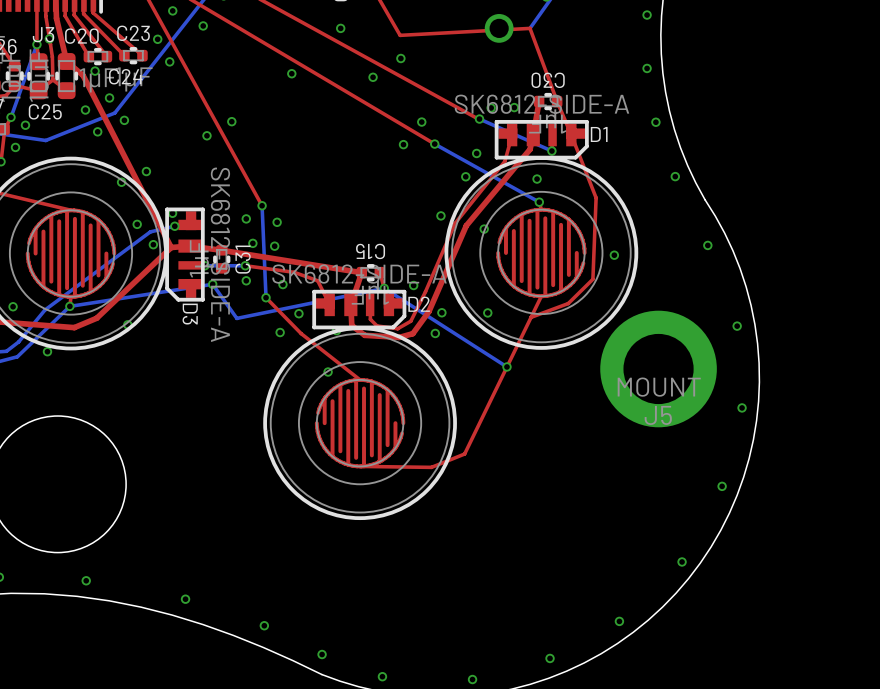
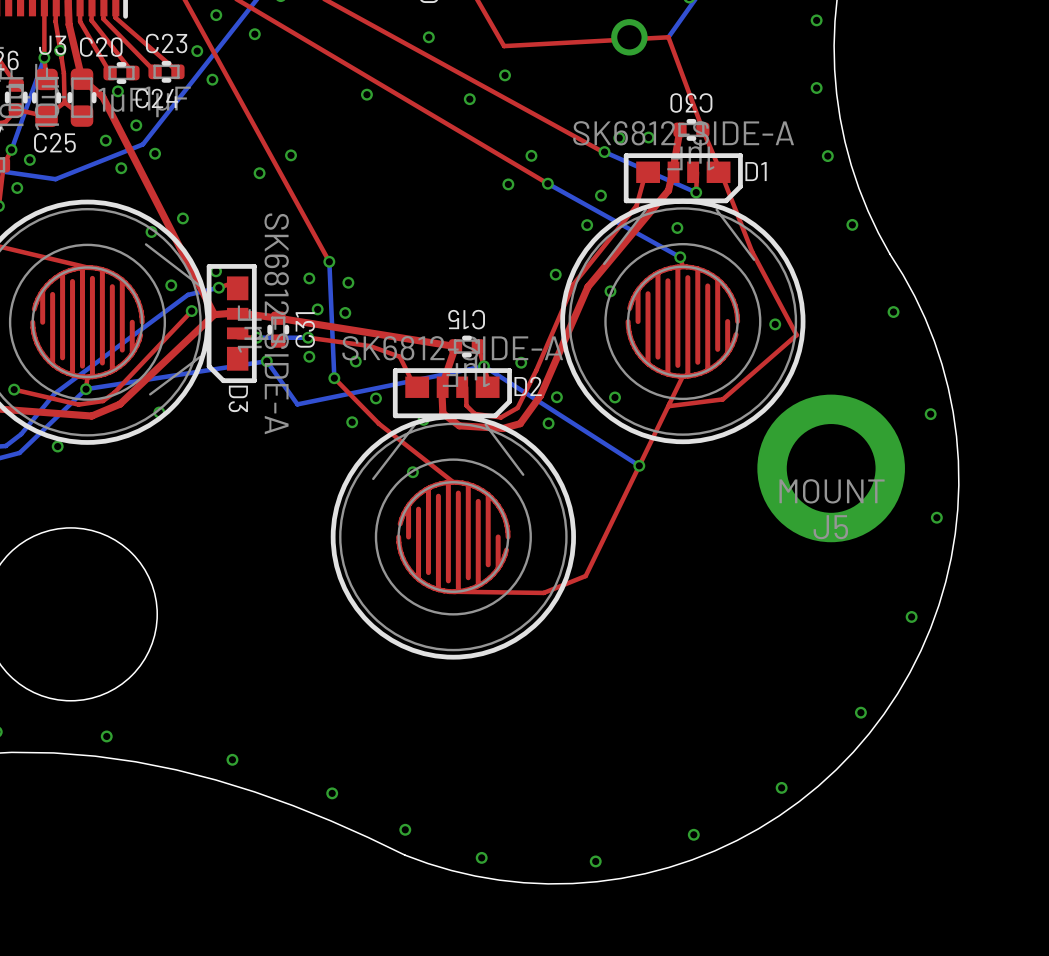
D1 footprint: [494, 119, 589, 160] -> [602, 153, 756, 266]
top track: (596, 197) (592, 279) (568, 303) (531, 317) -> (752, 251) (796, 335) (722, 399) (668, 406)
D3 footprint: [165, 207, 205, 302] -> [144, 243, 257, 396]
top track: none -> (191, 311) (114, 392) (102, 401) (78, 404) (14, 389)
D2 footprint: [312, 289, 407, 330] -> [372, 368, 525, 481]

